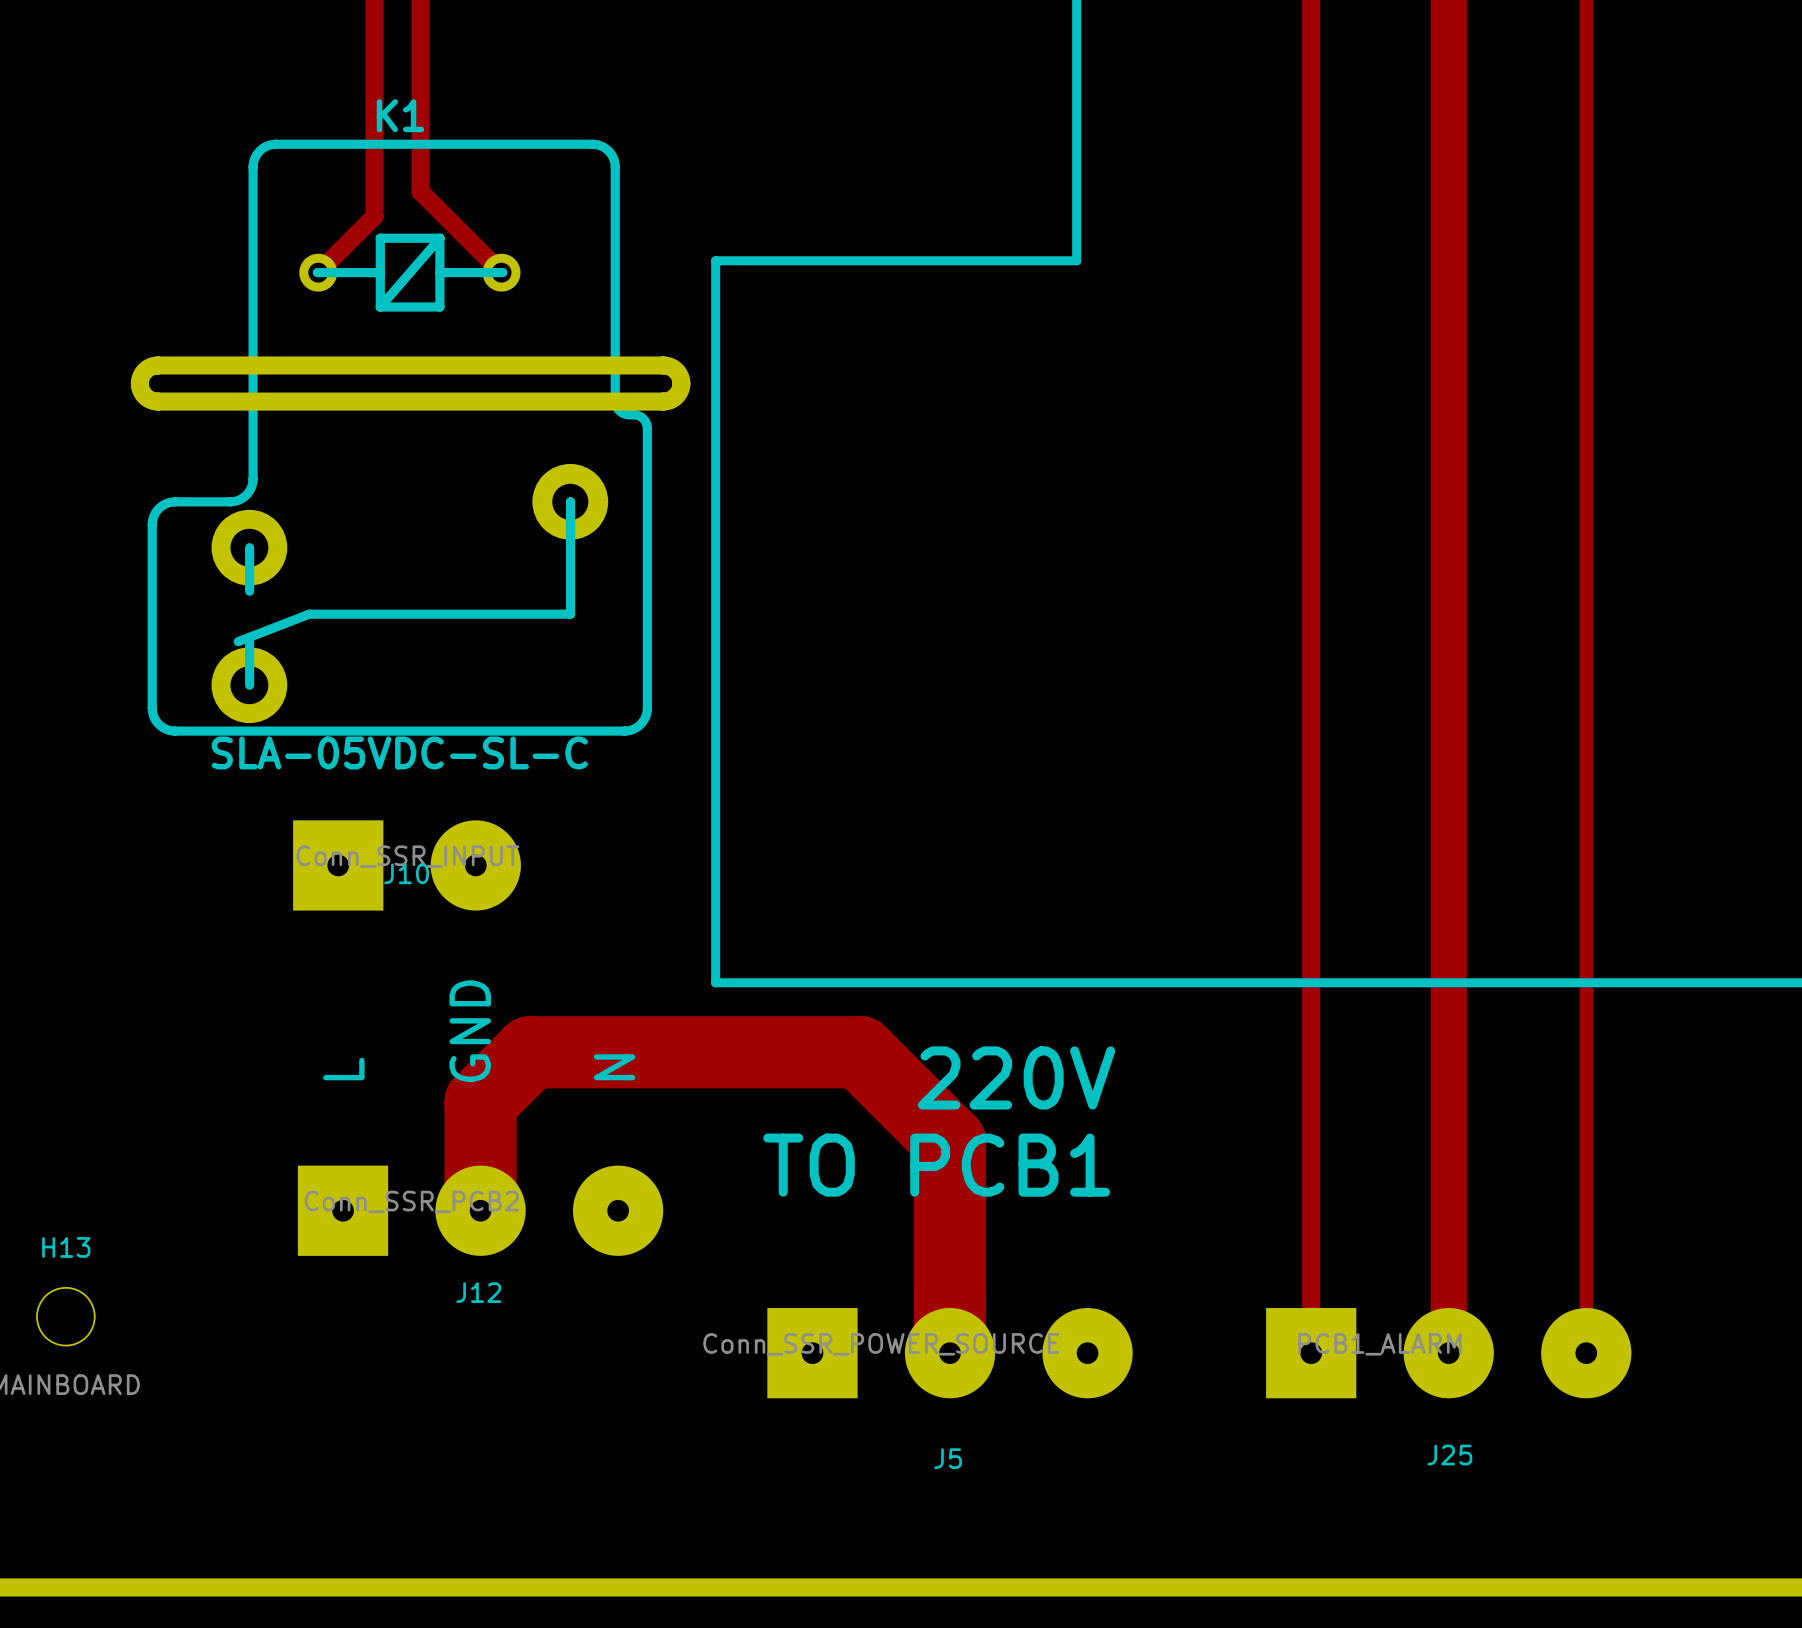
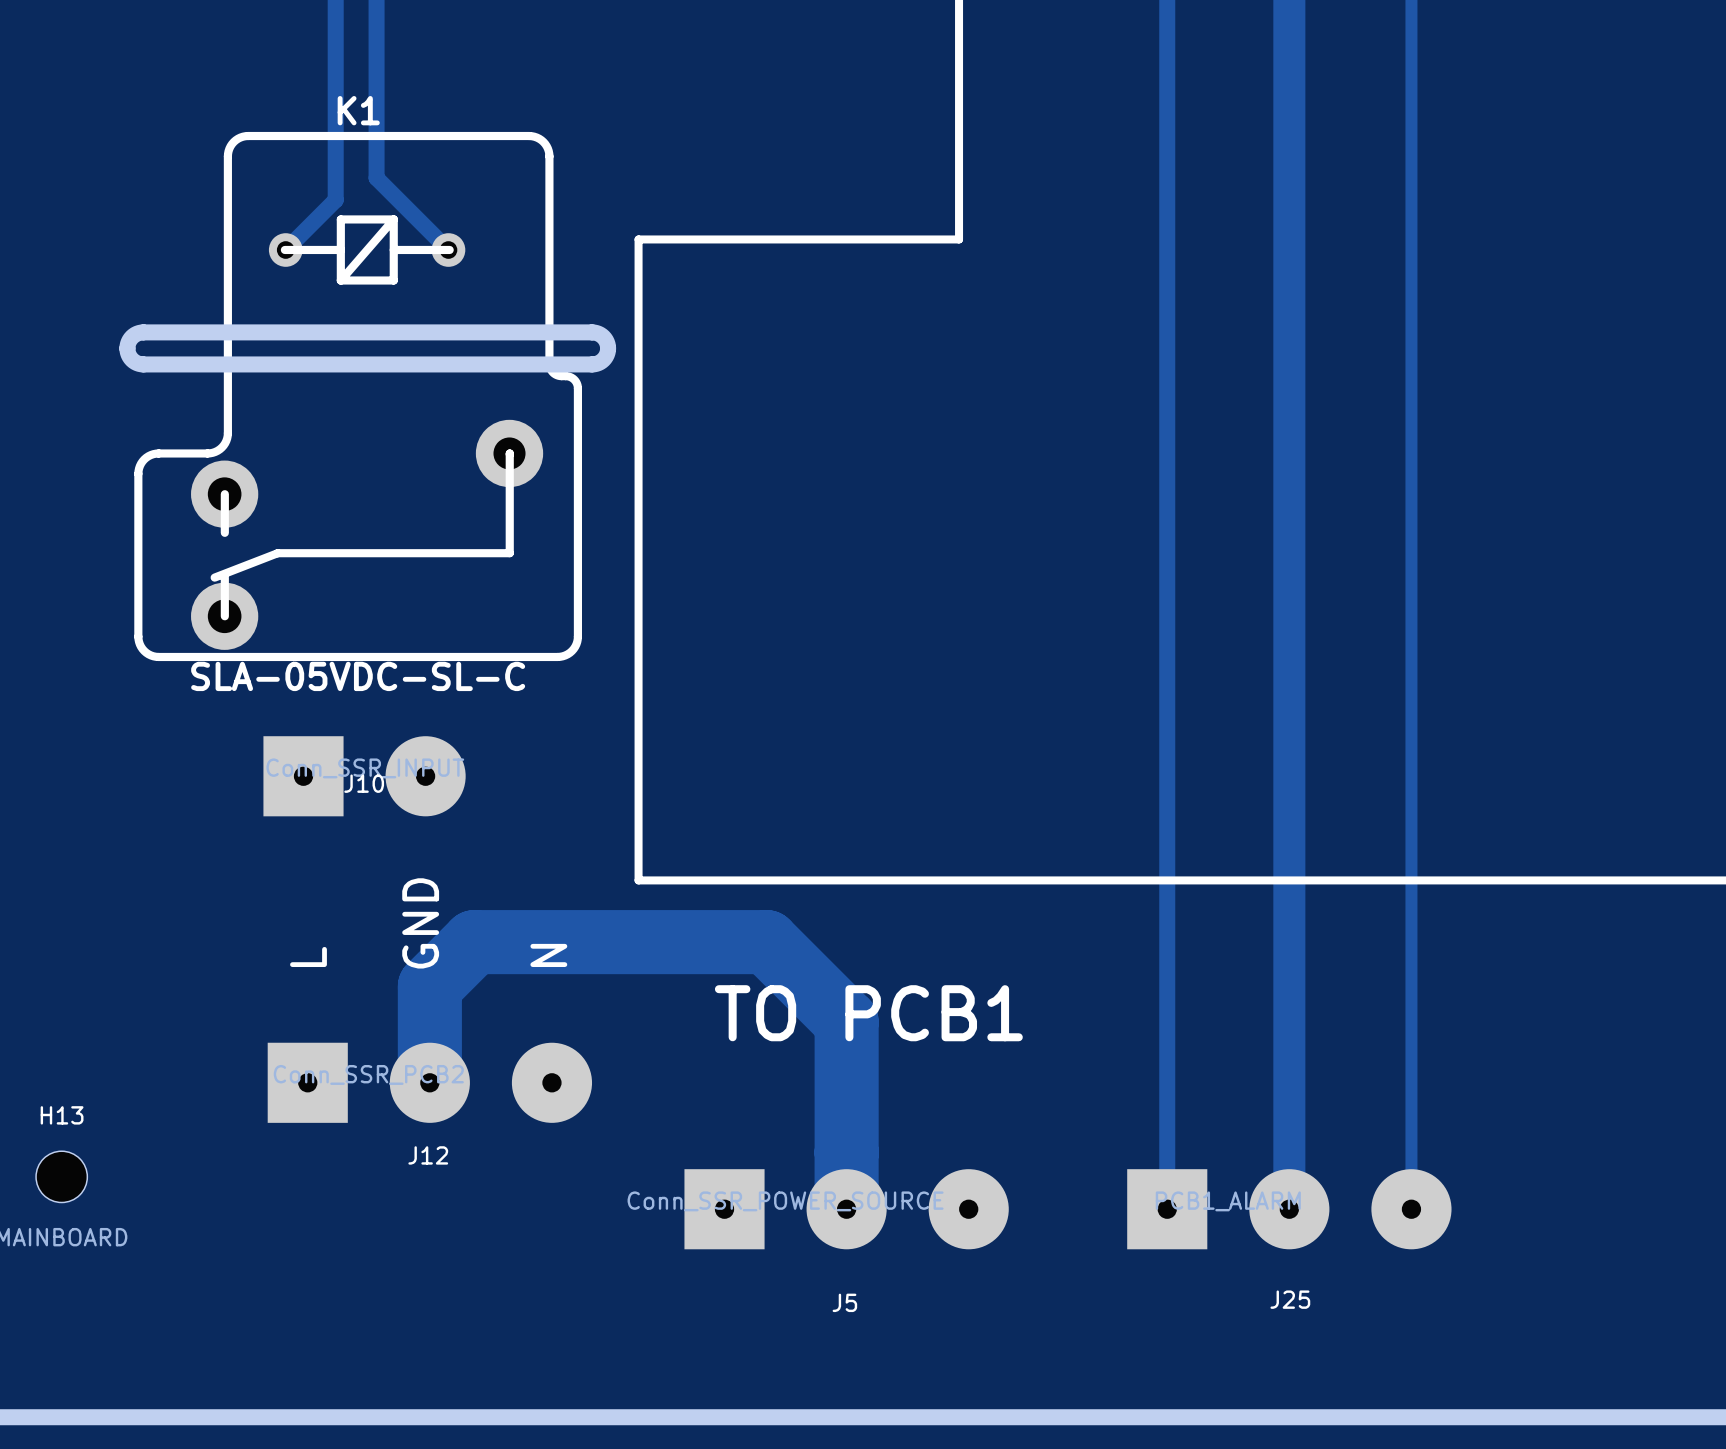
text: 220V (1016, 1077) -> none
text position: TO PCB1 (936, 1165) -> TO PCB1 (868, 1013)

